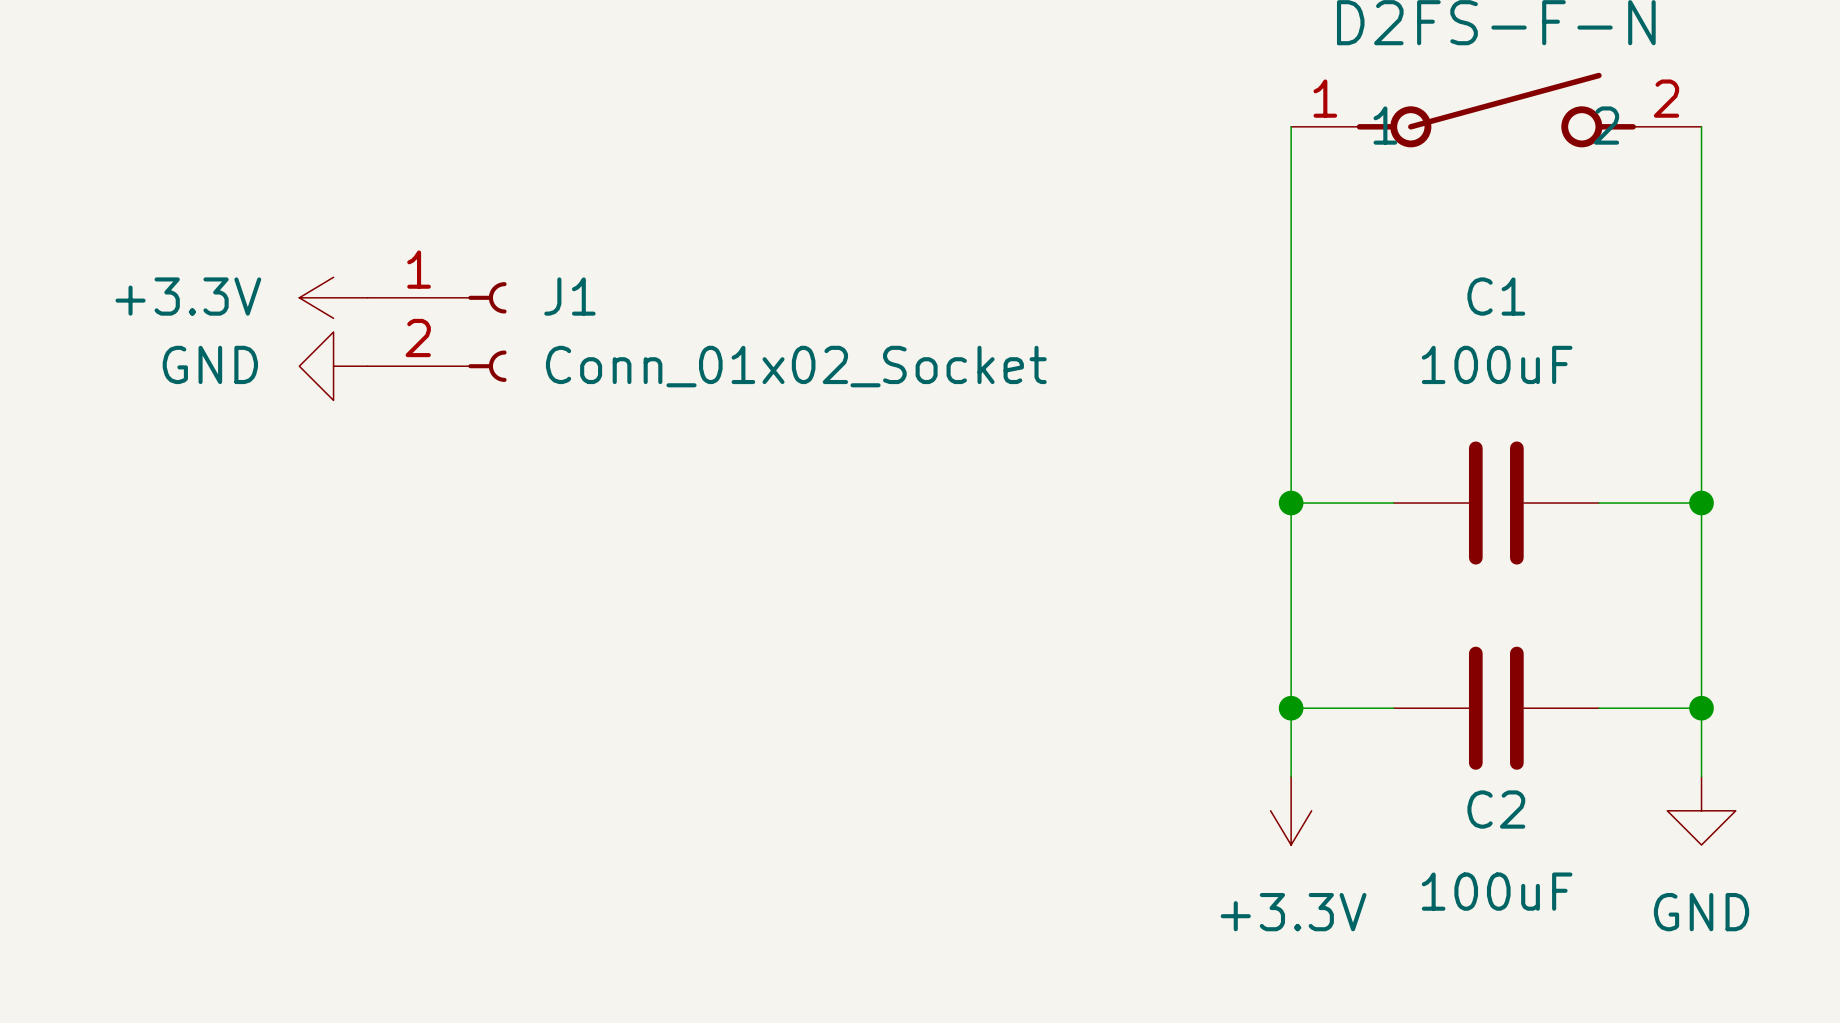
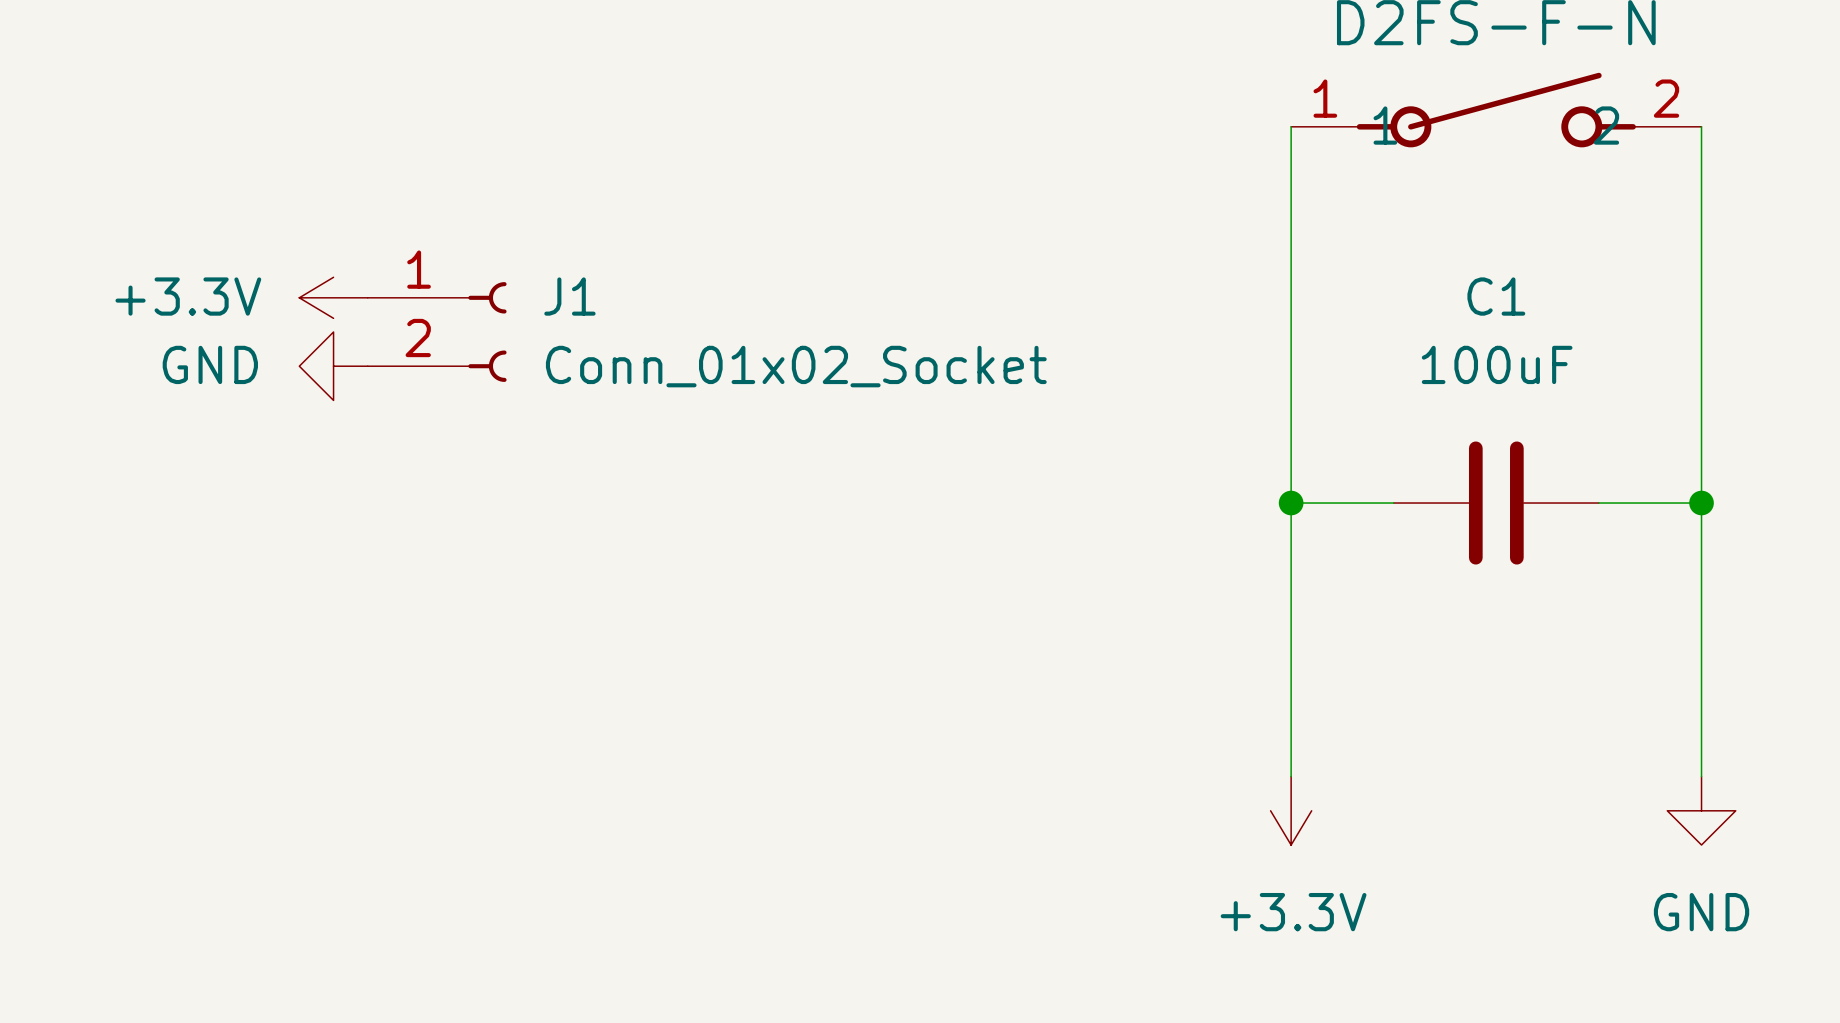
wire: (1291, 708) (1393, 708) -> none
junction: (1291, 708) -> none
C2: 100uF (1496, 708) -> none
wire: (1598, 708) (1701, 708) -> none
junction: (1701, 708) -> none

